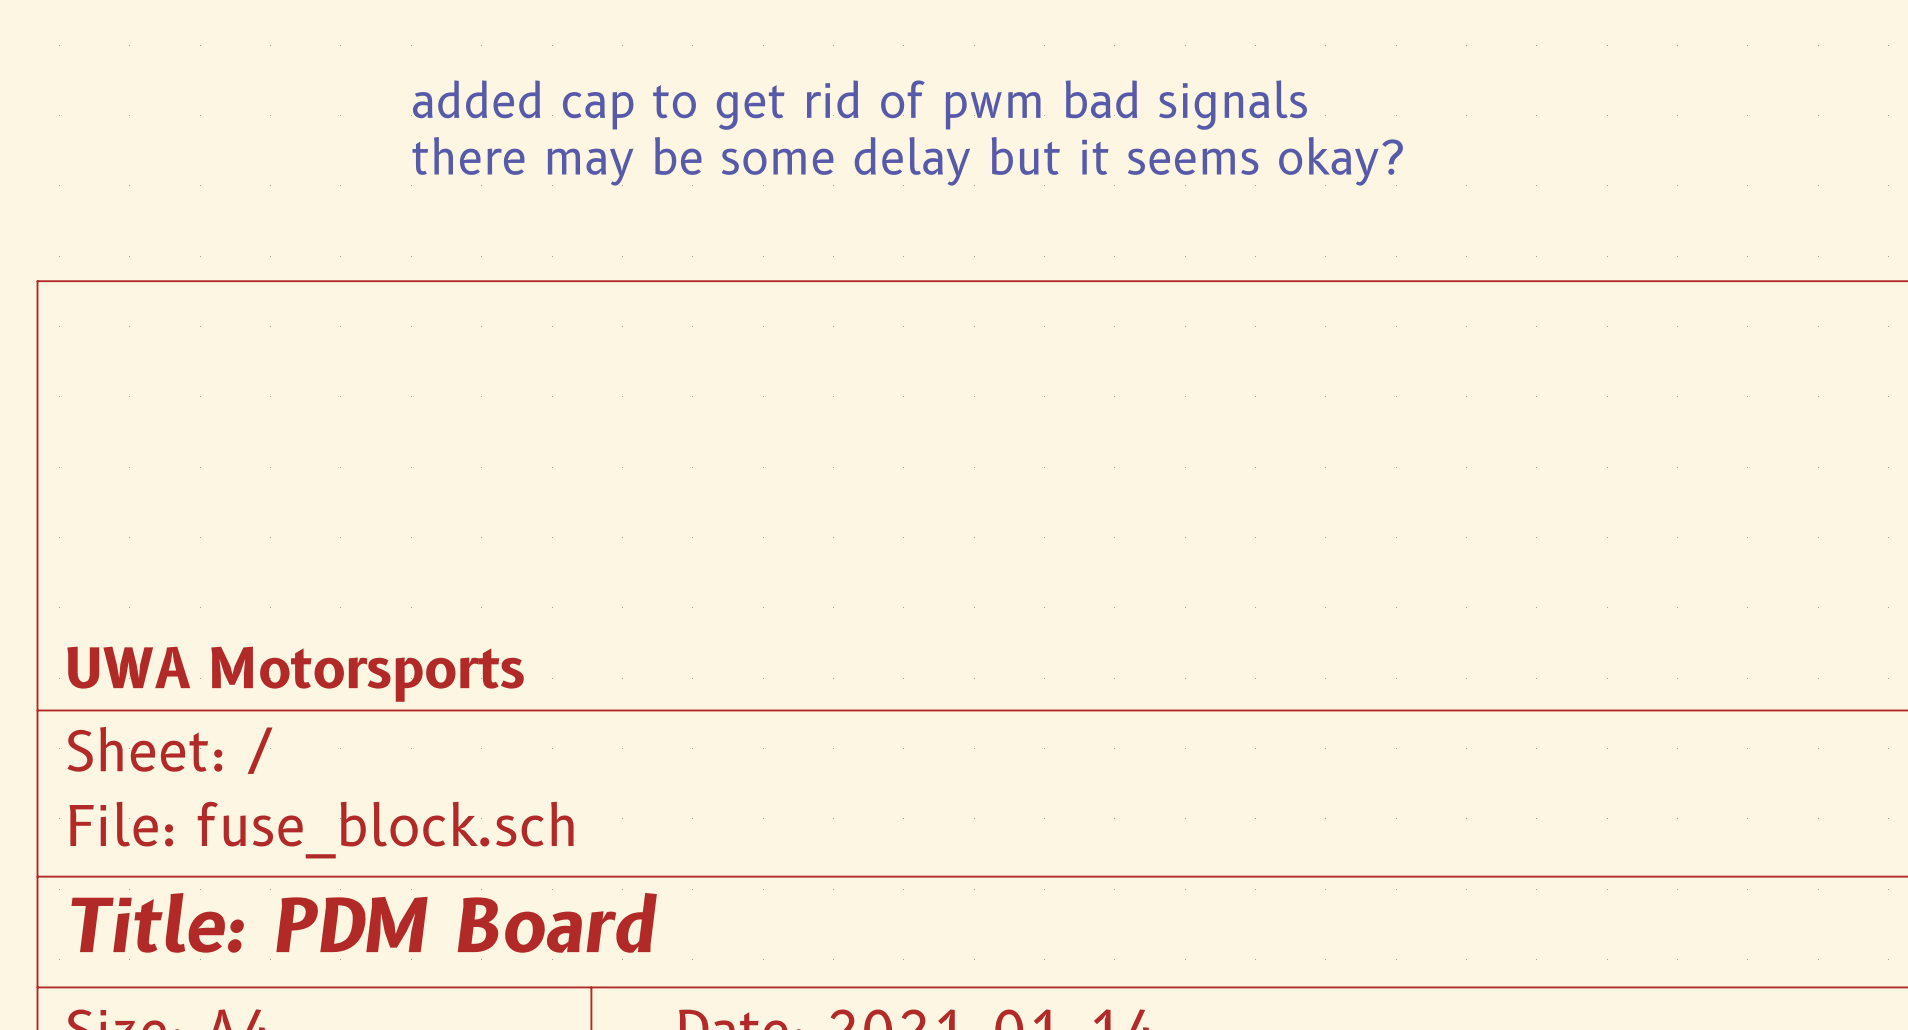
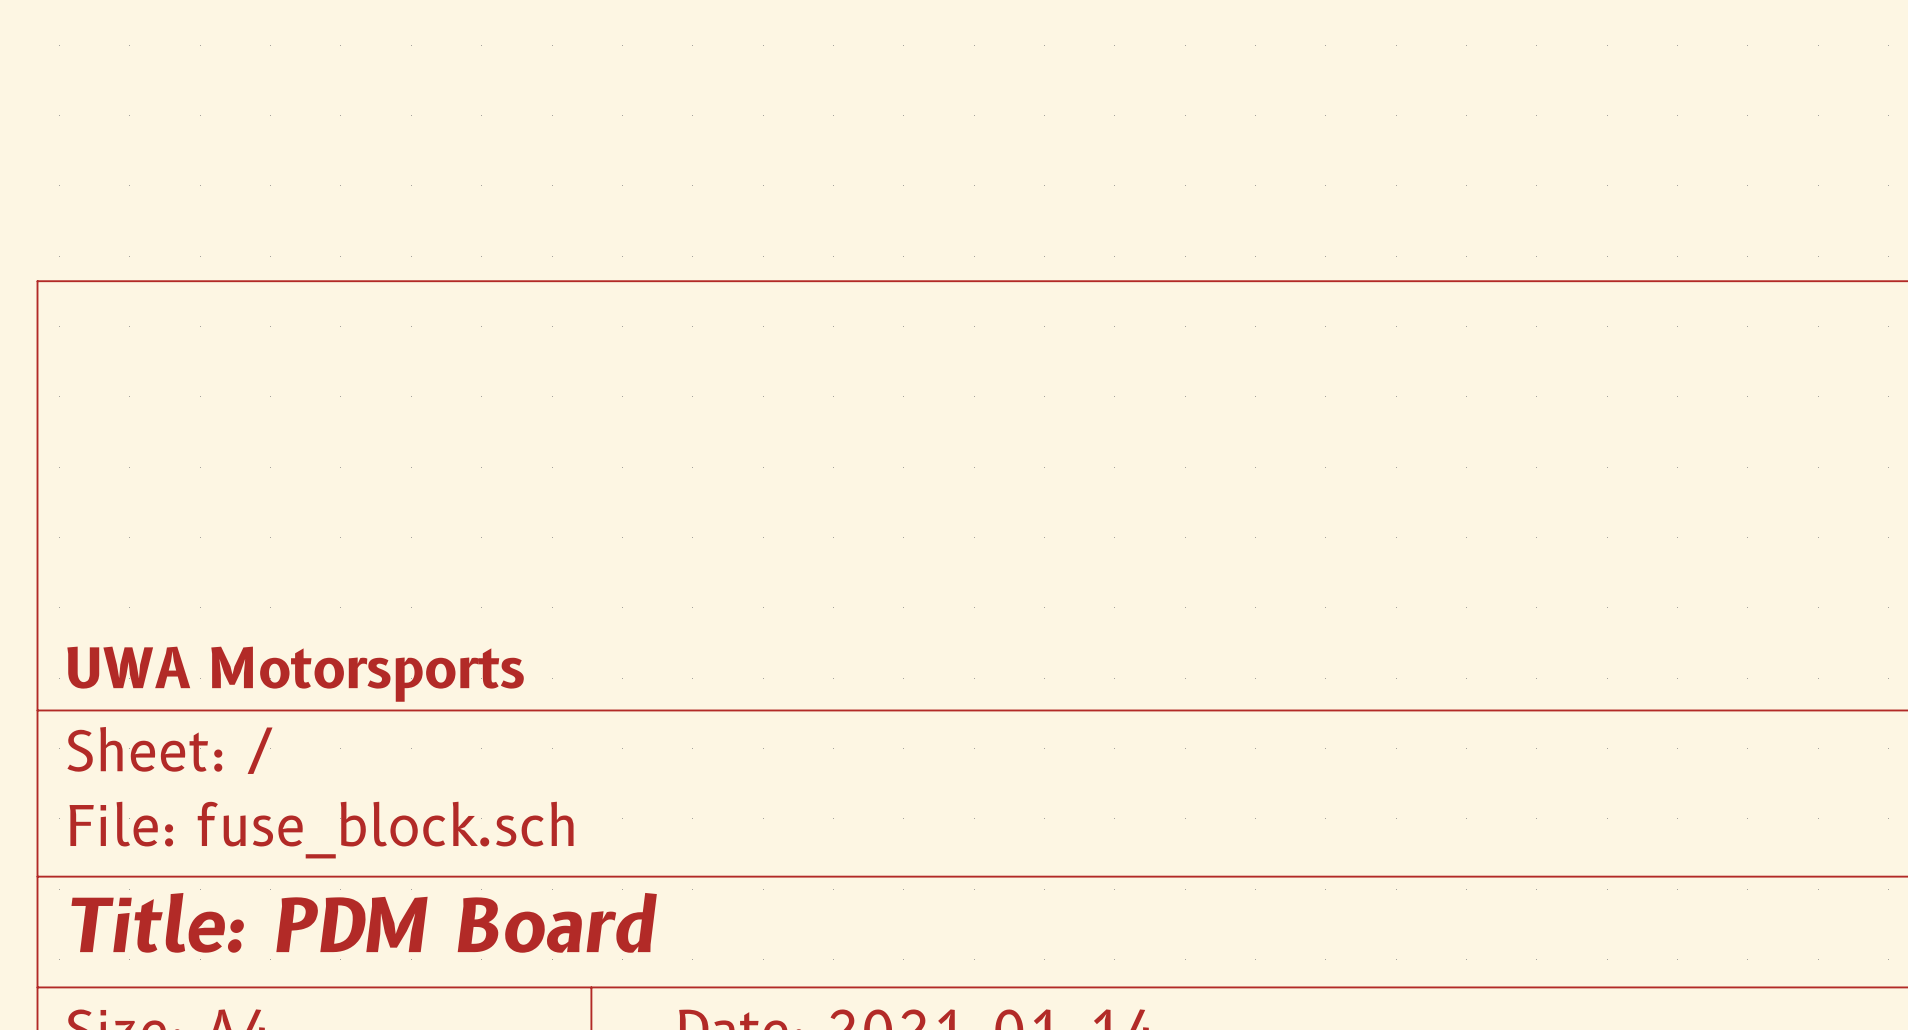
text: added cap to get rid of pwm bad signals (859, 105) -> none
text: there may be some delay but it seems okay? (907, 161) -> none

